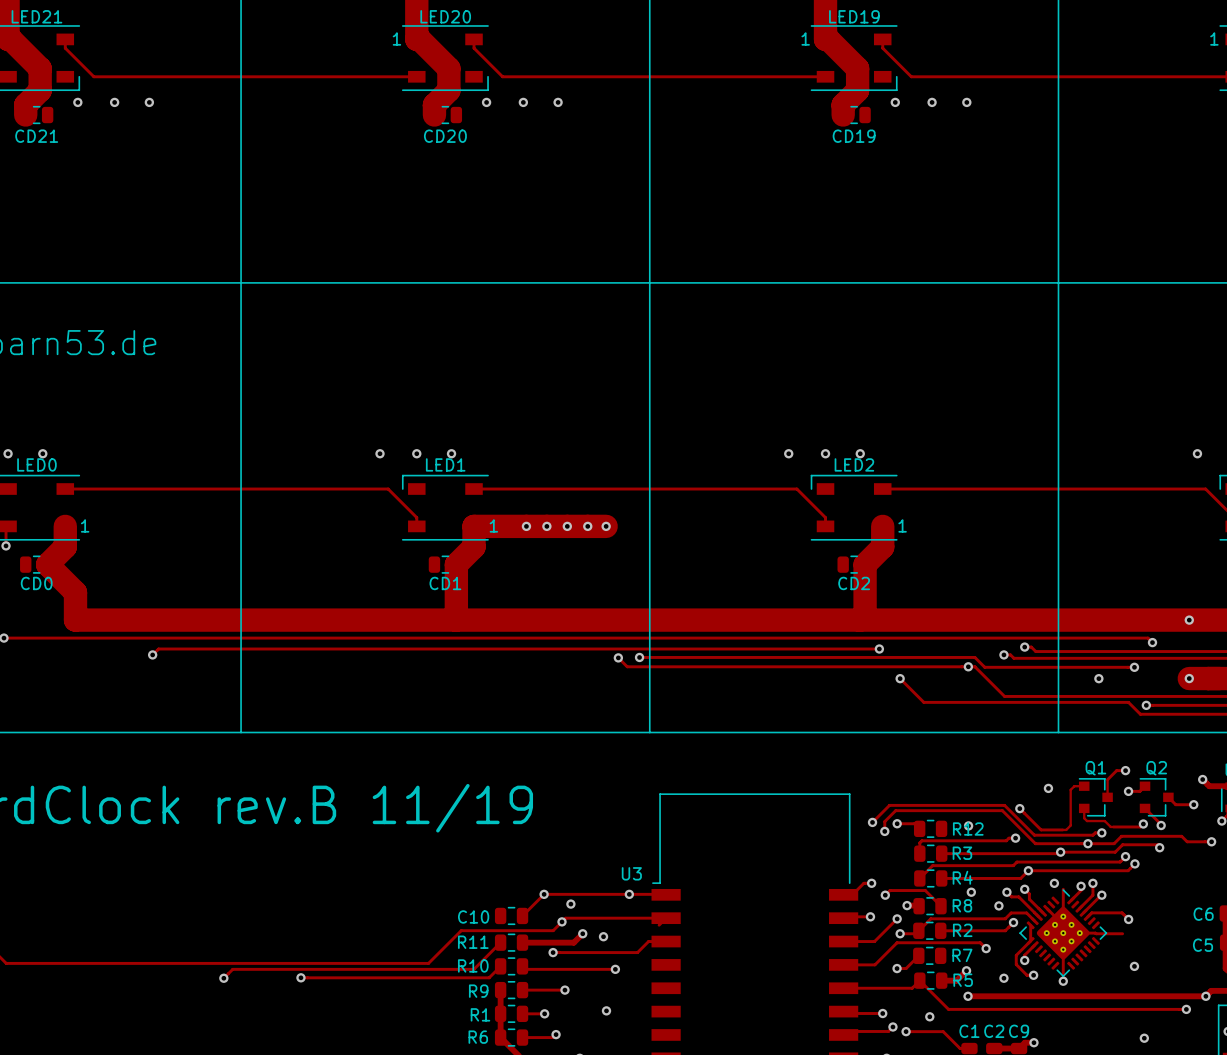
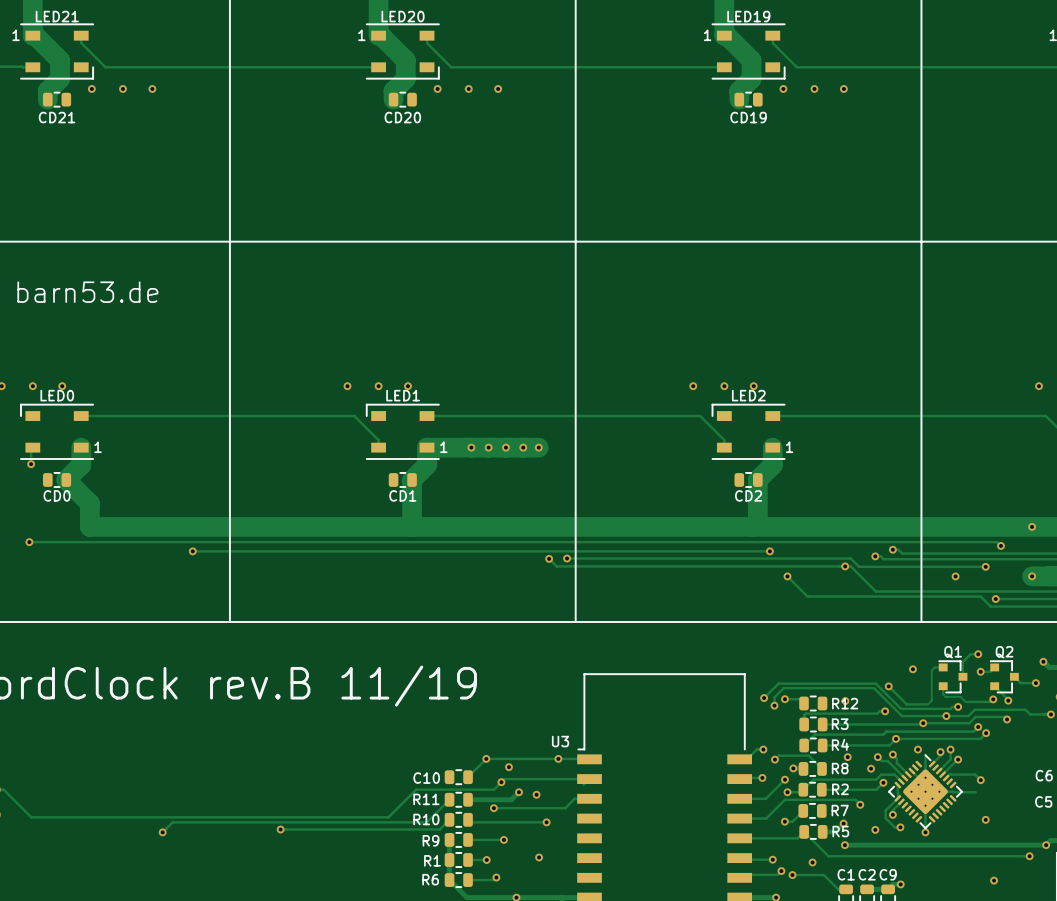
track: (197, 649) (158, 649) (152, 654) -> none
via position: (152, 654) -> (192, 551)
track: (232, 969) (223, 978) -> (222, 822) (172, 822) (162, 832)
via position: (223, 978) -> (162, 832)

